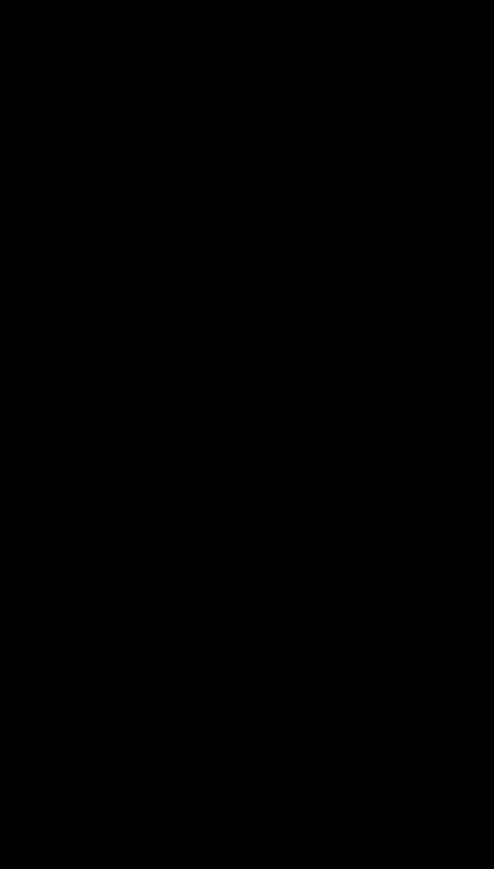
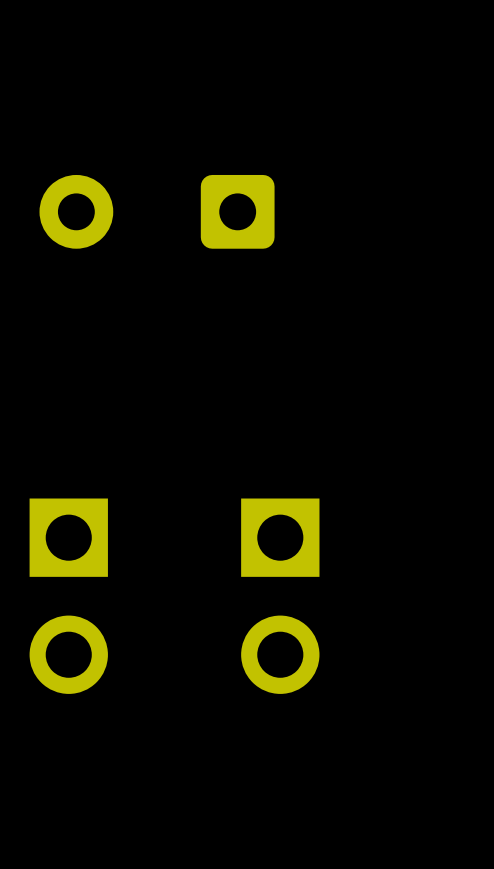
part: none -> (157, 211)
part: none -> (68, 596)
part: none -> (280, 596)

